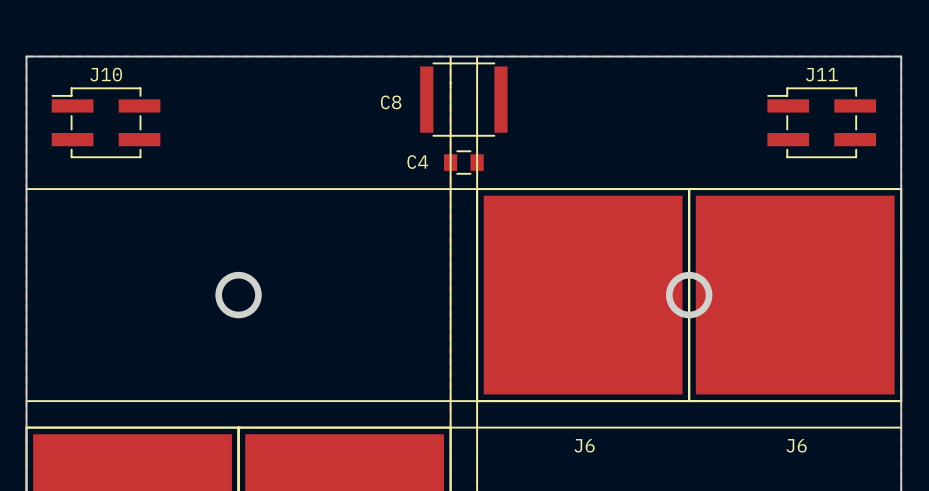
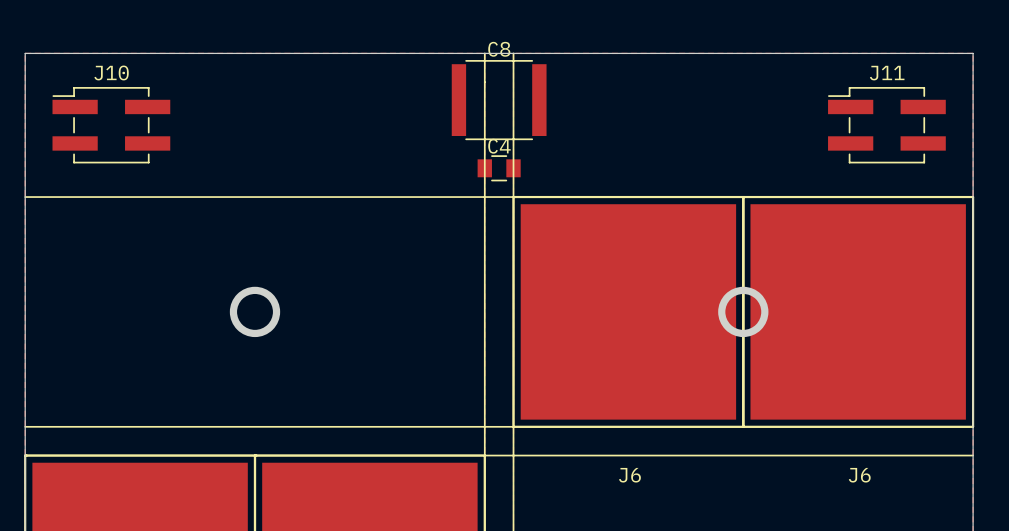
C8 name position: C8 (391, 102) -> C8 (499, 49)
C4 name position: C4 (417, 162) -> C4 (499, 146)

